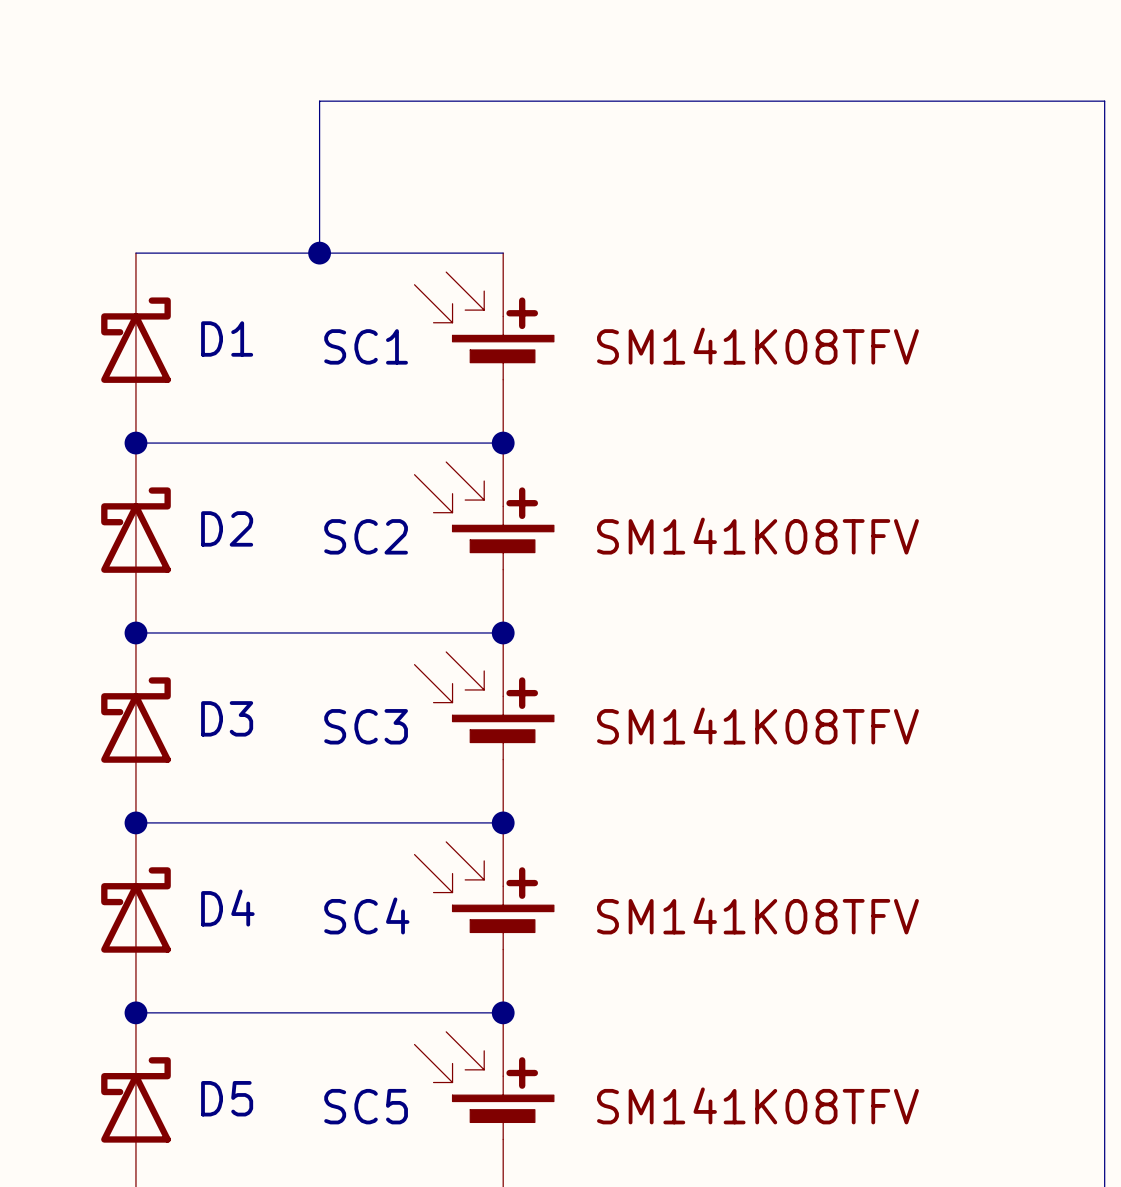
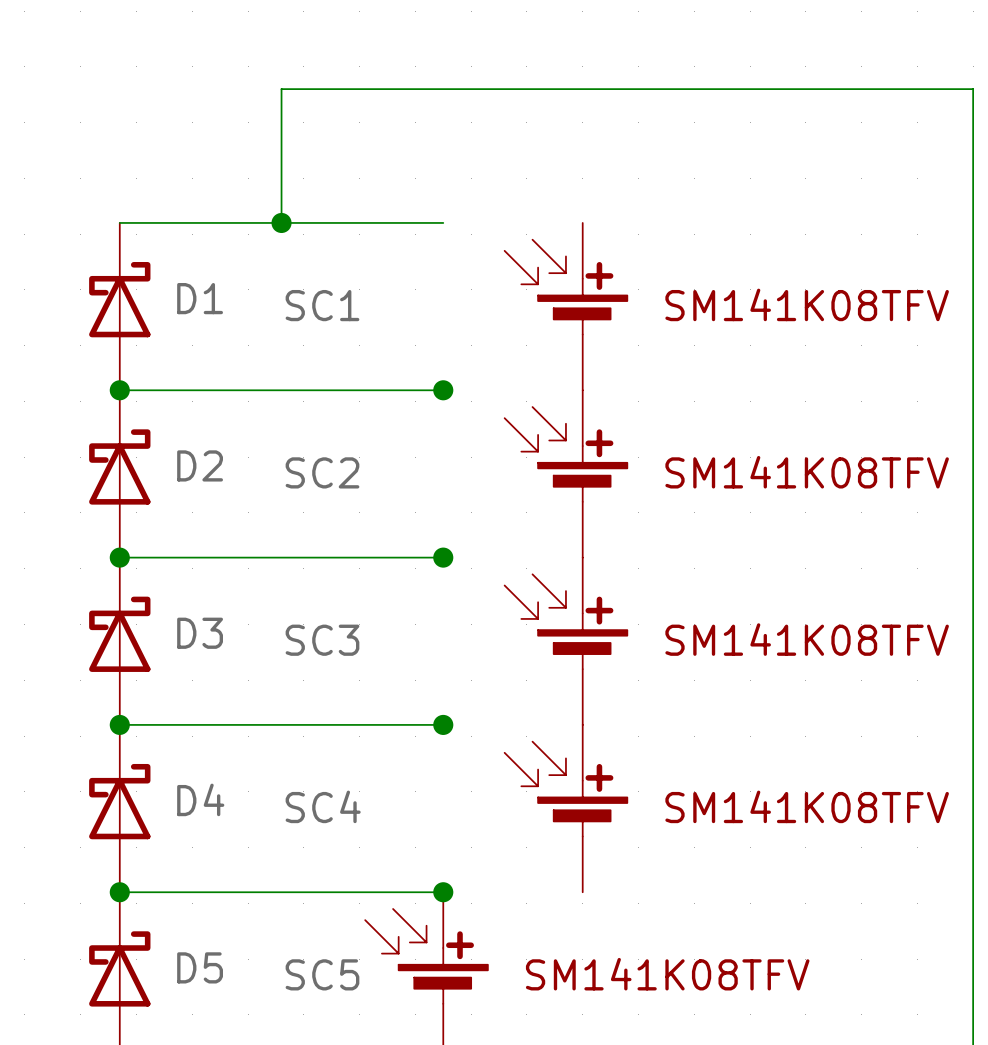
SC1 position: (484, 348) -> (565, 306)
SC2 position: (484, 538) -> (565, 473)
SC3 position: (484, 727) -> (565, 641)
SC4 position: (484, 917) -> (565, 808)

